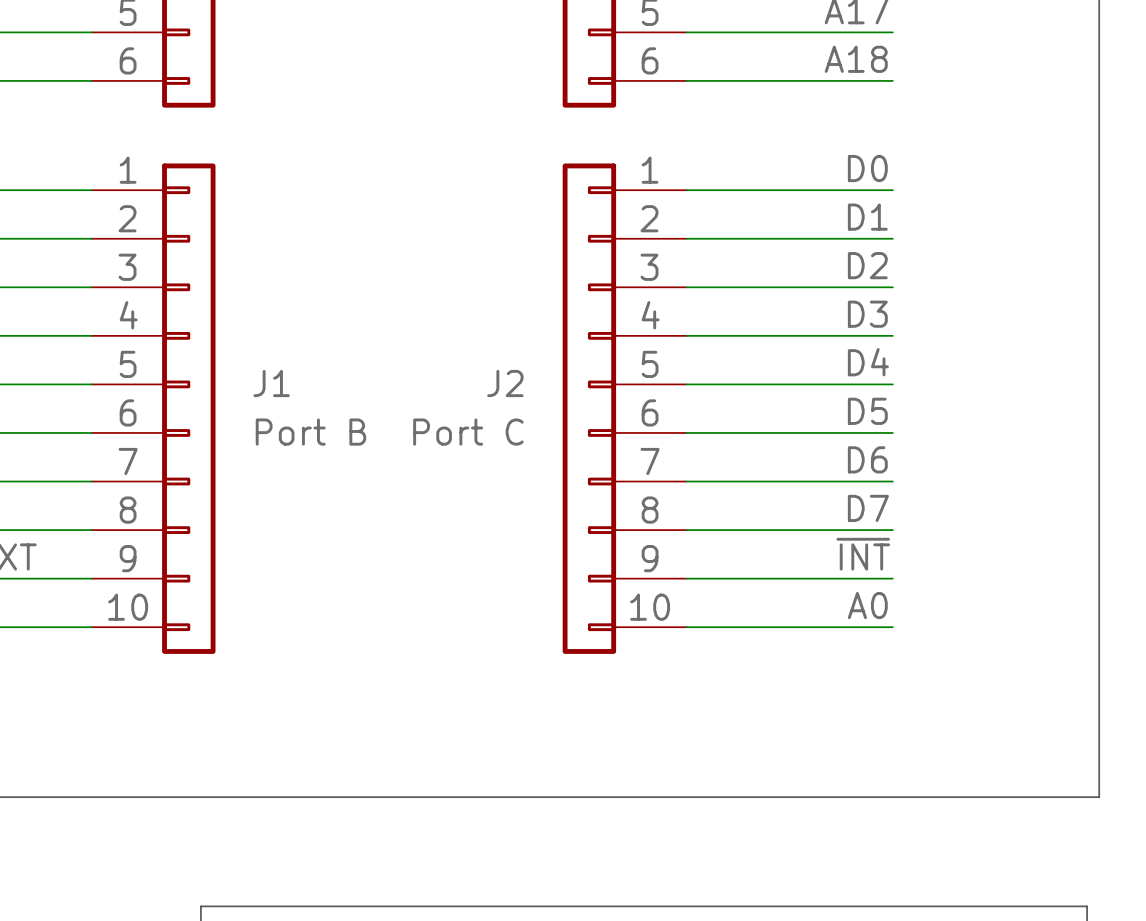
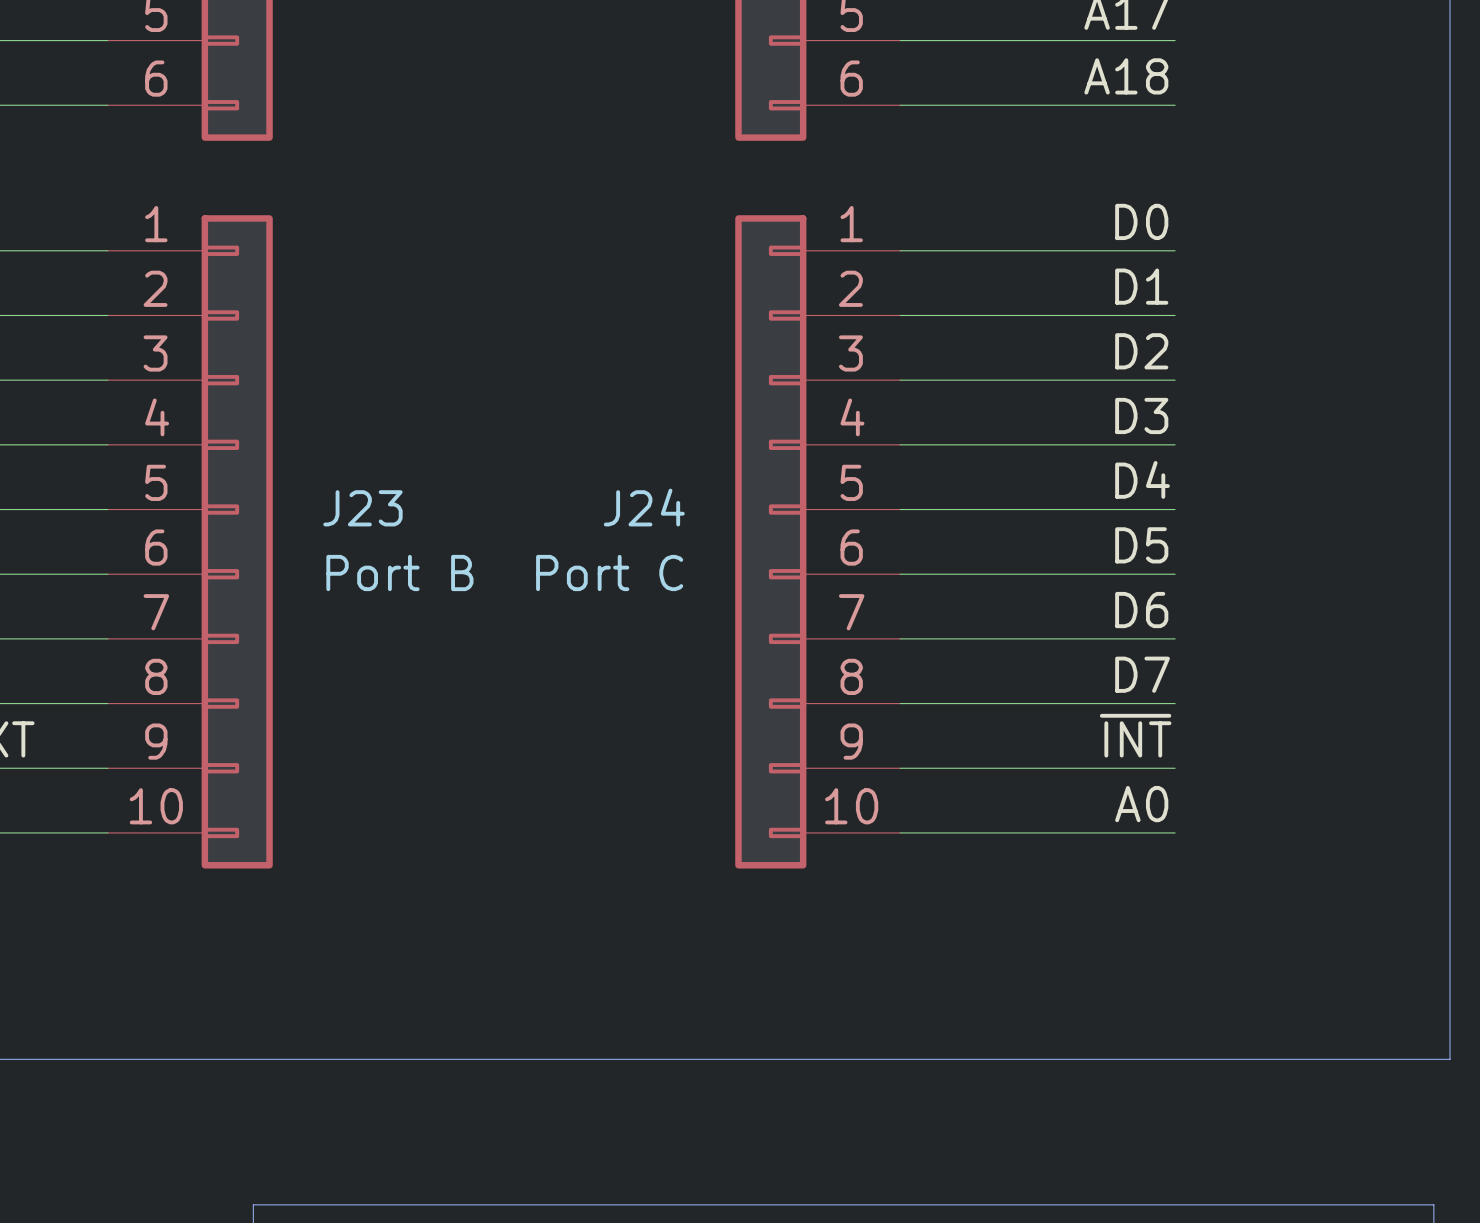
J1 name: J1 (271, 383) -> J23 (362, 508)
J2 name: J2 (505, 383) -> J24 (644, 507)

